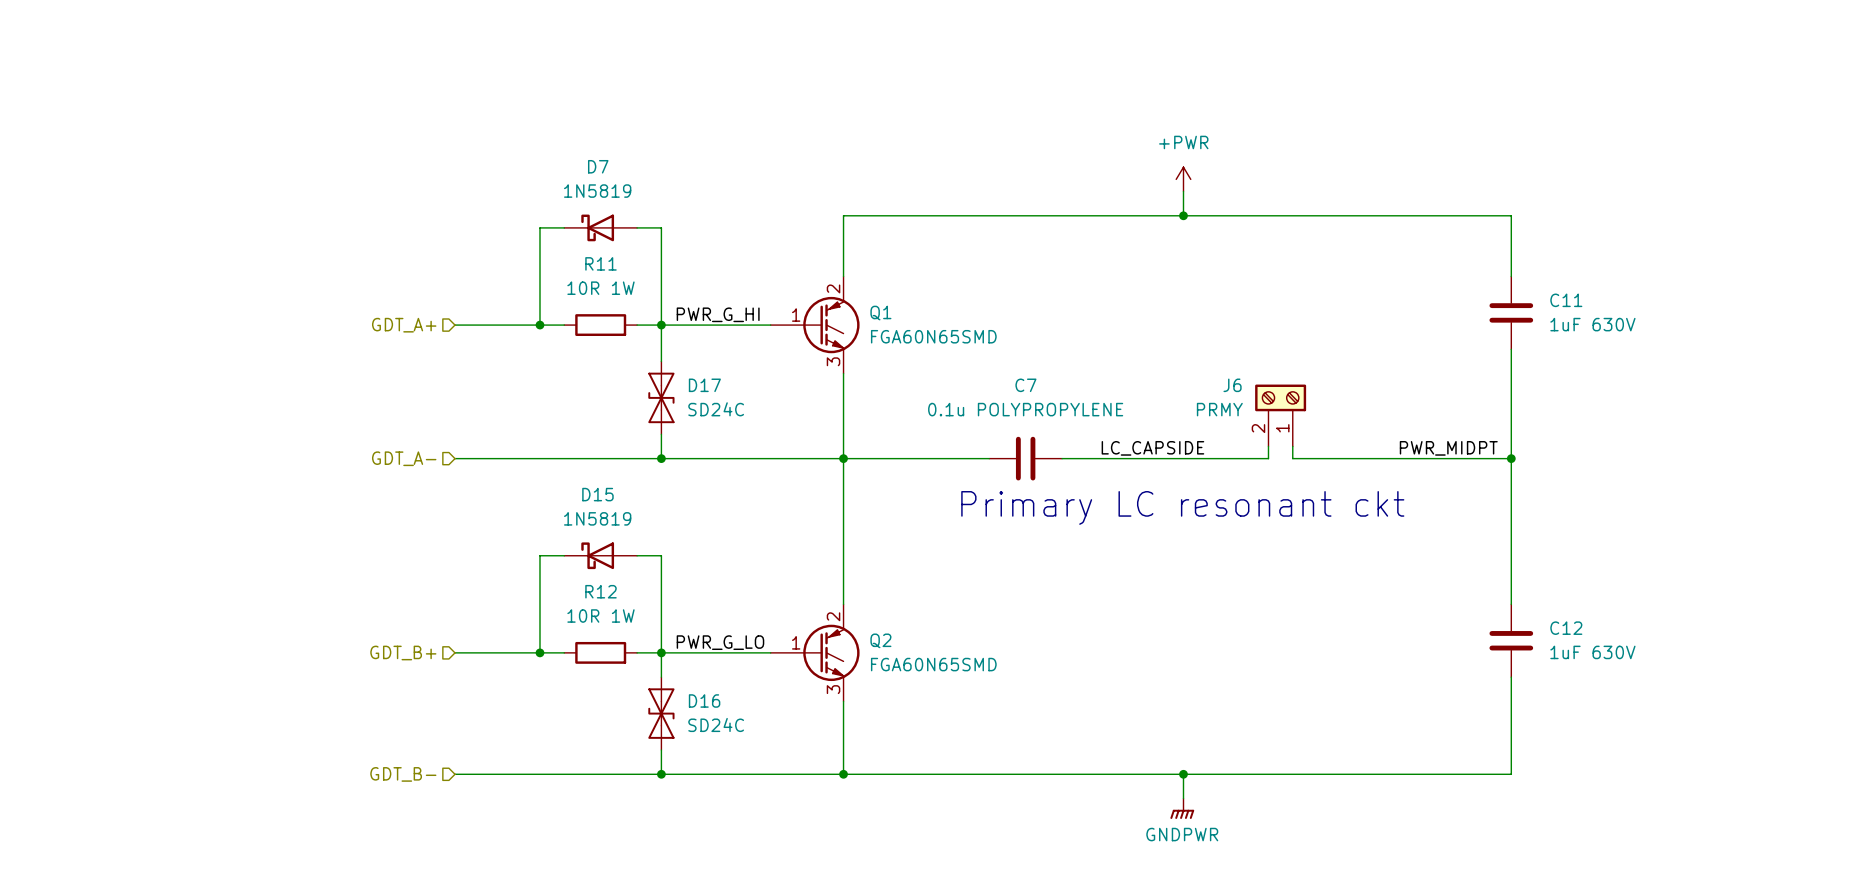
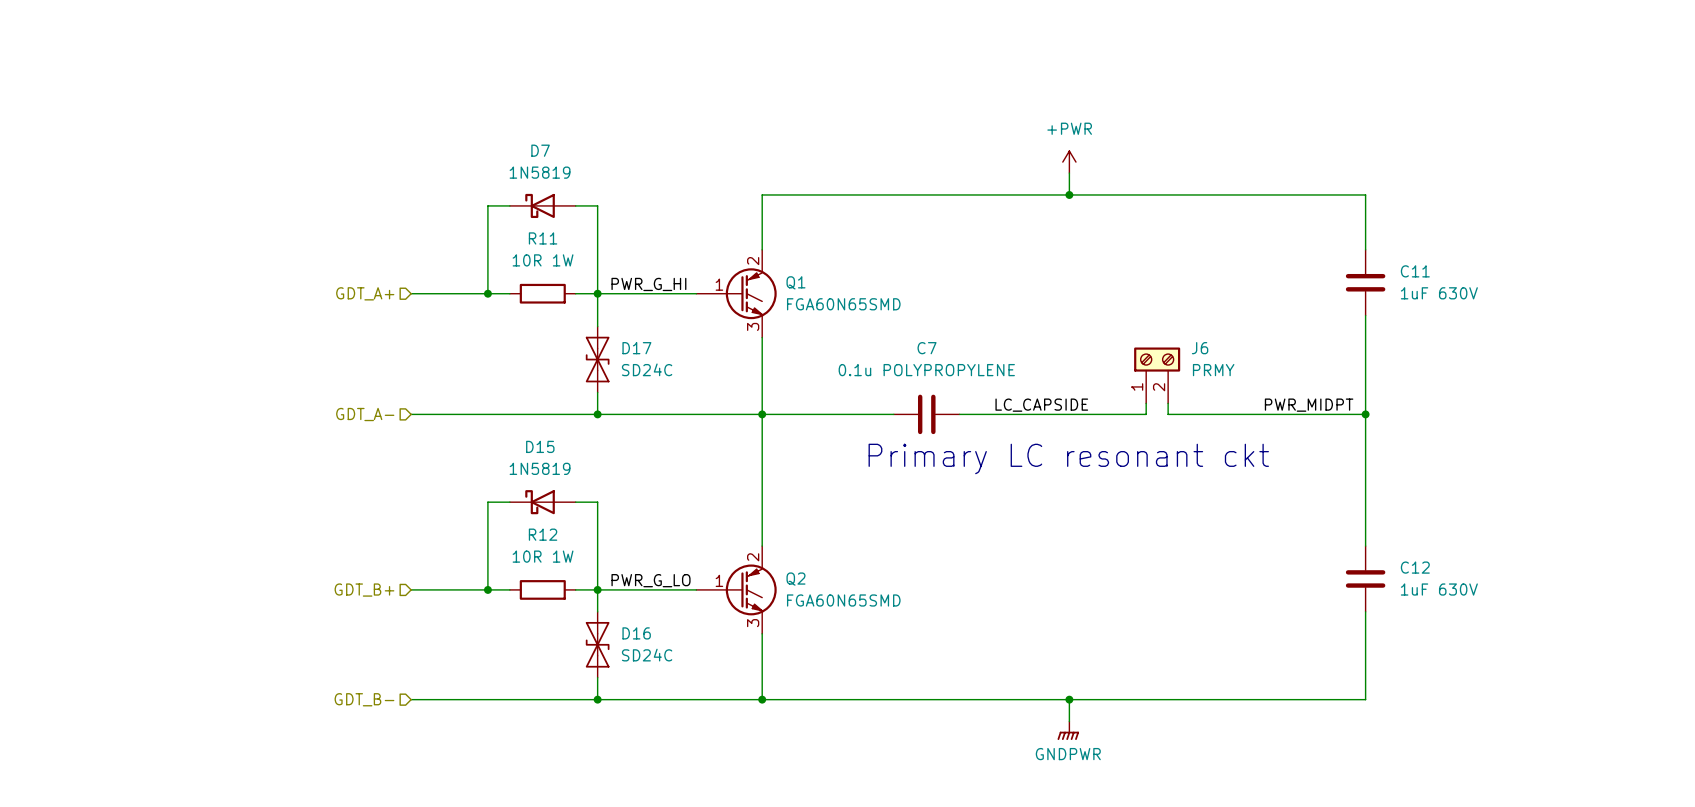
J6 flip: as is (1280, 397) -> left-right (1157, 359)

